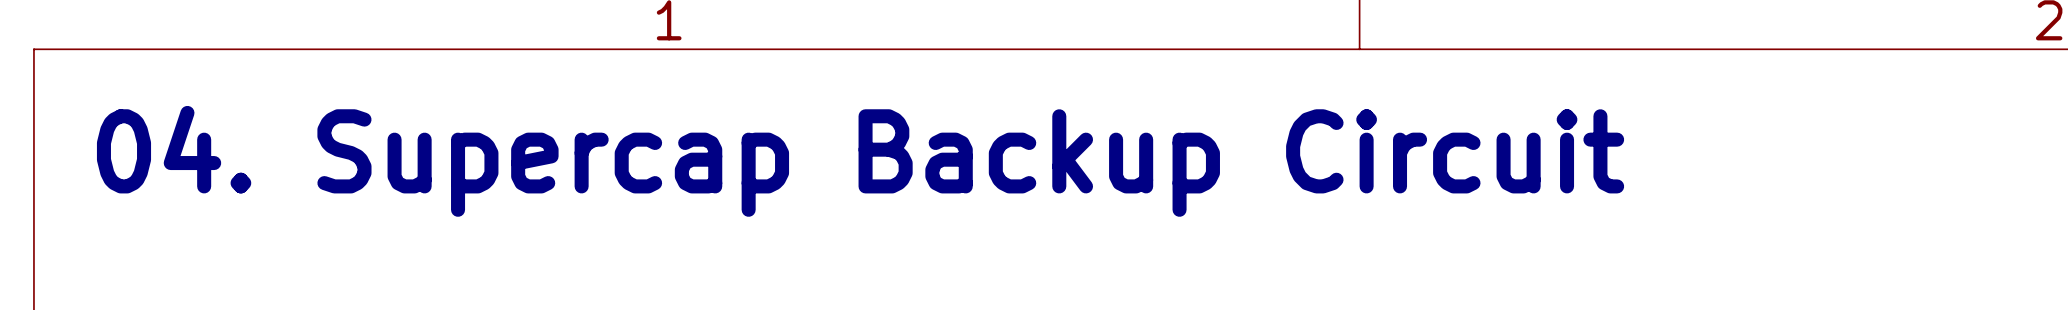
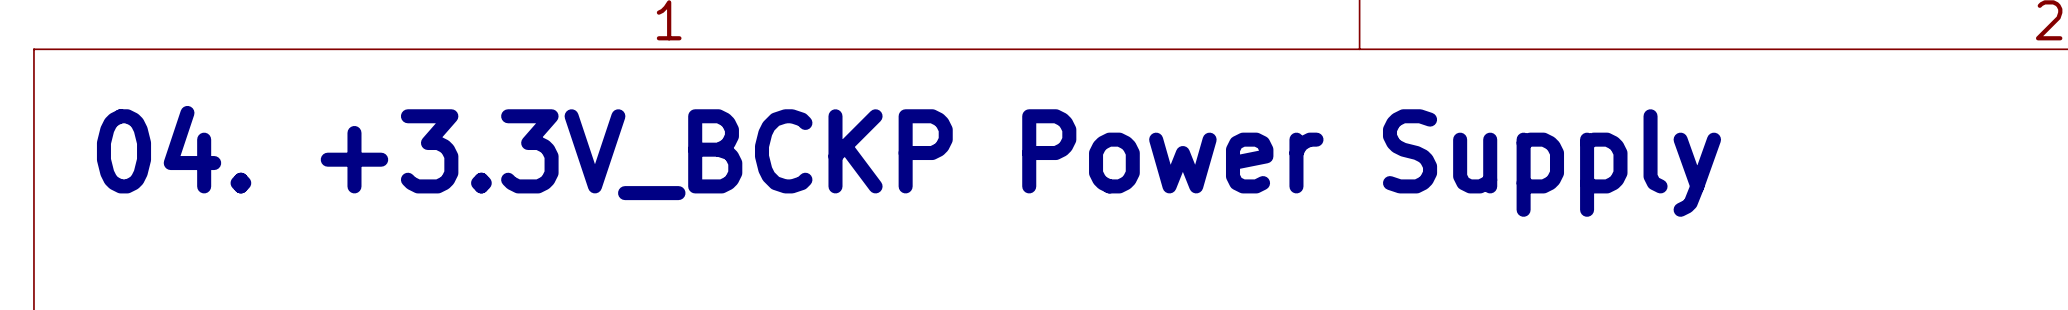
text: 04. Supercap Backup Circuit (860, 161) -> 04. +3.3V_BCKP Power Supply (908, 161)

